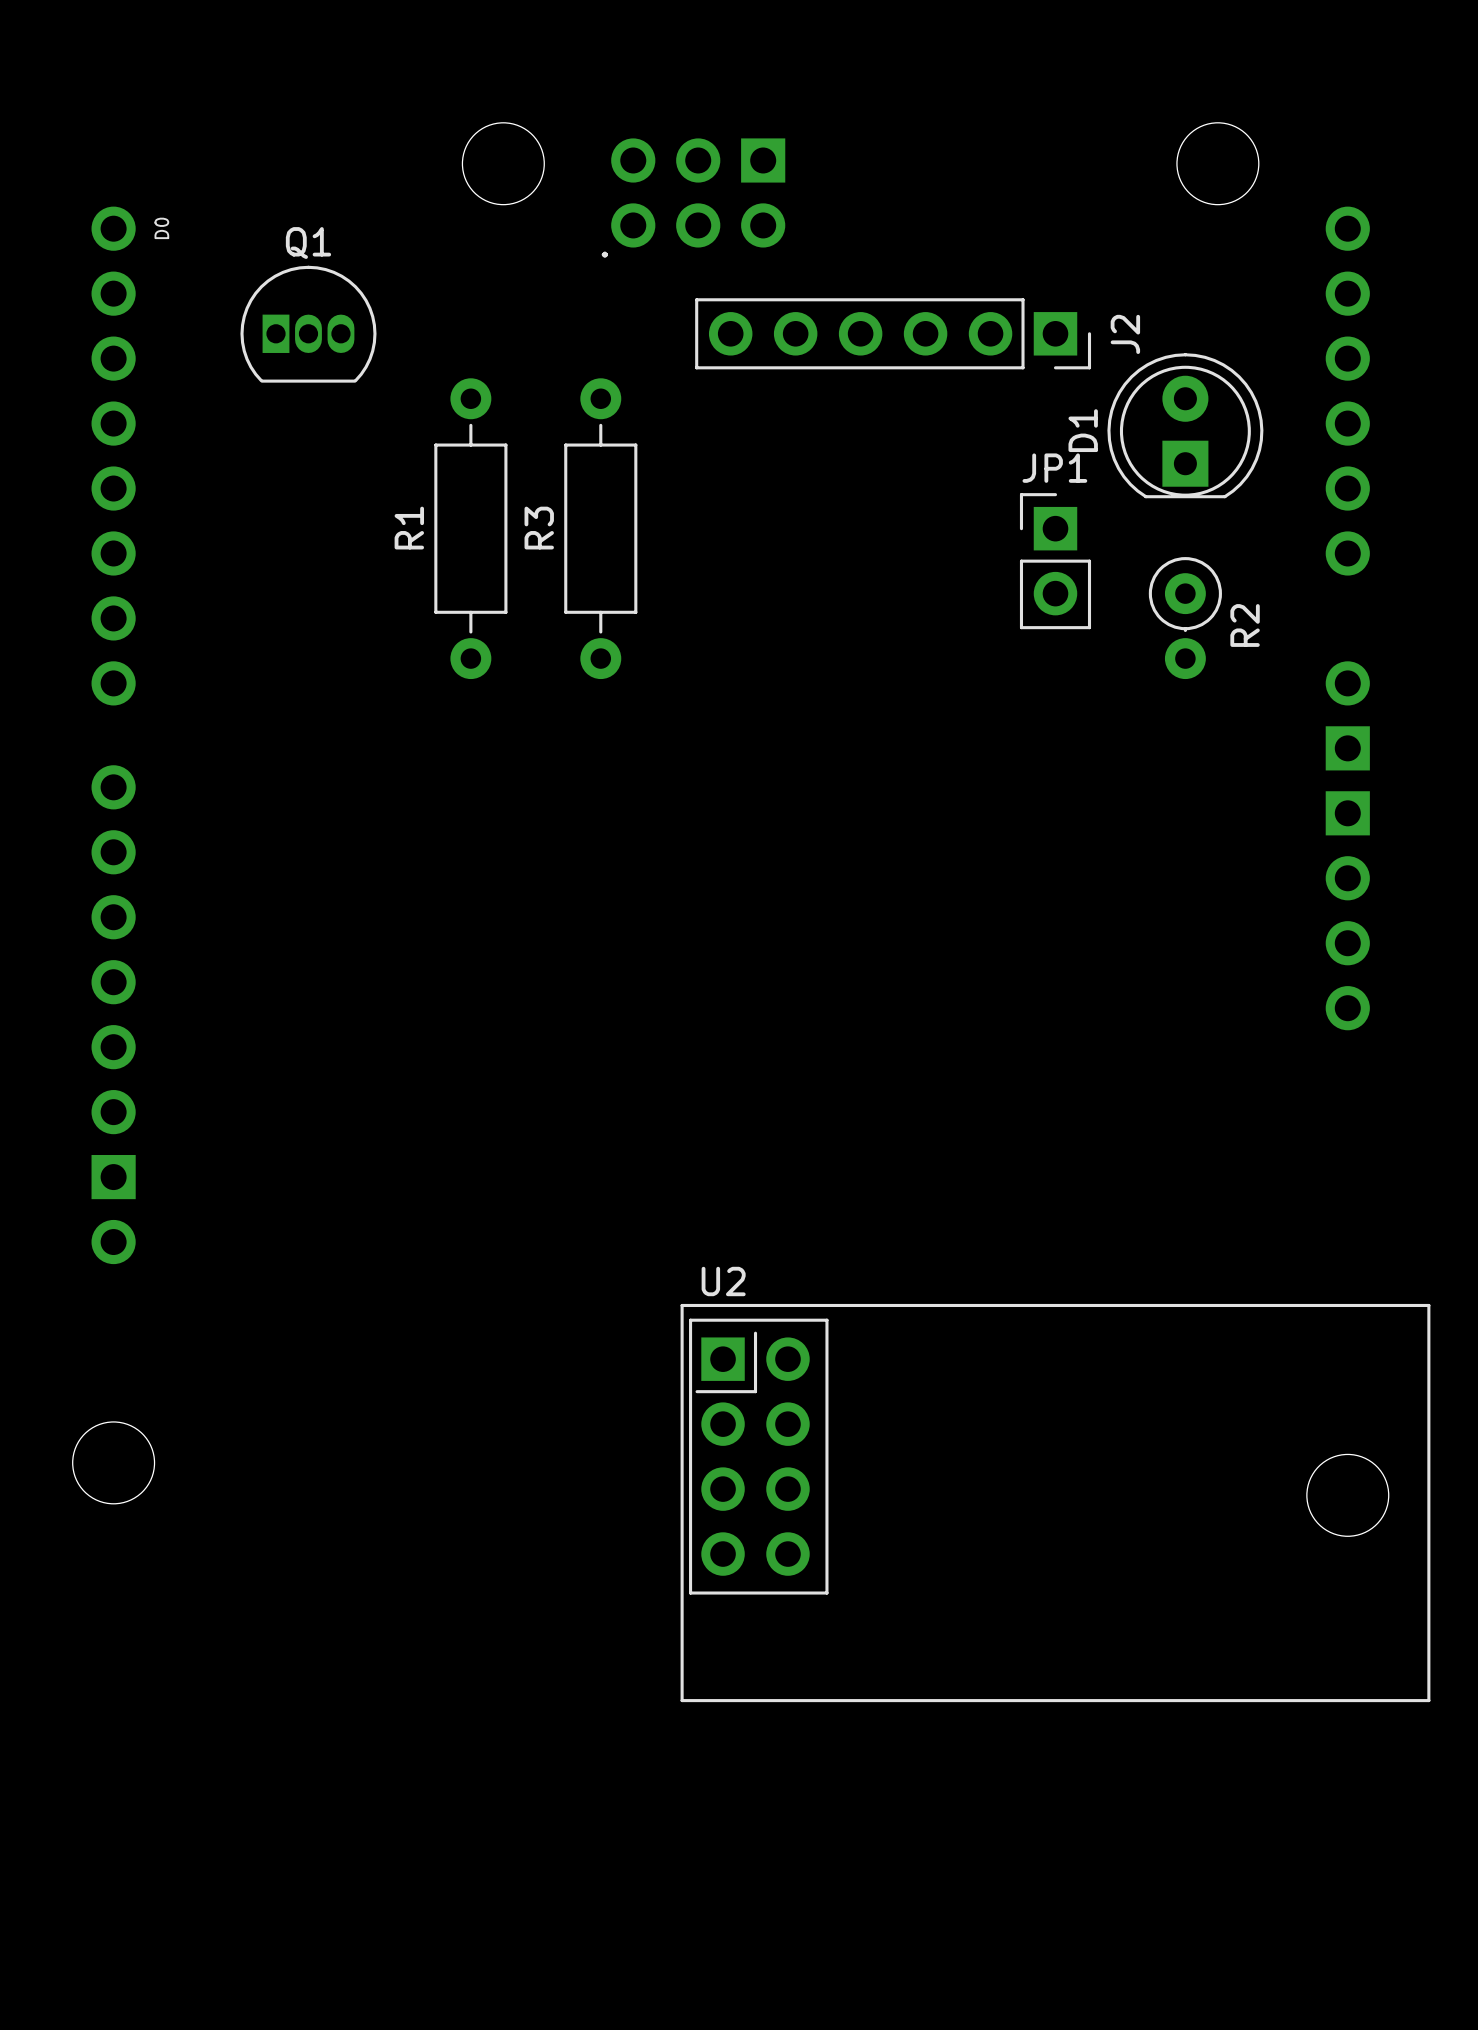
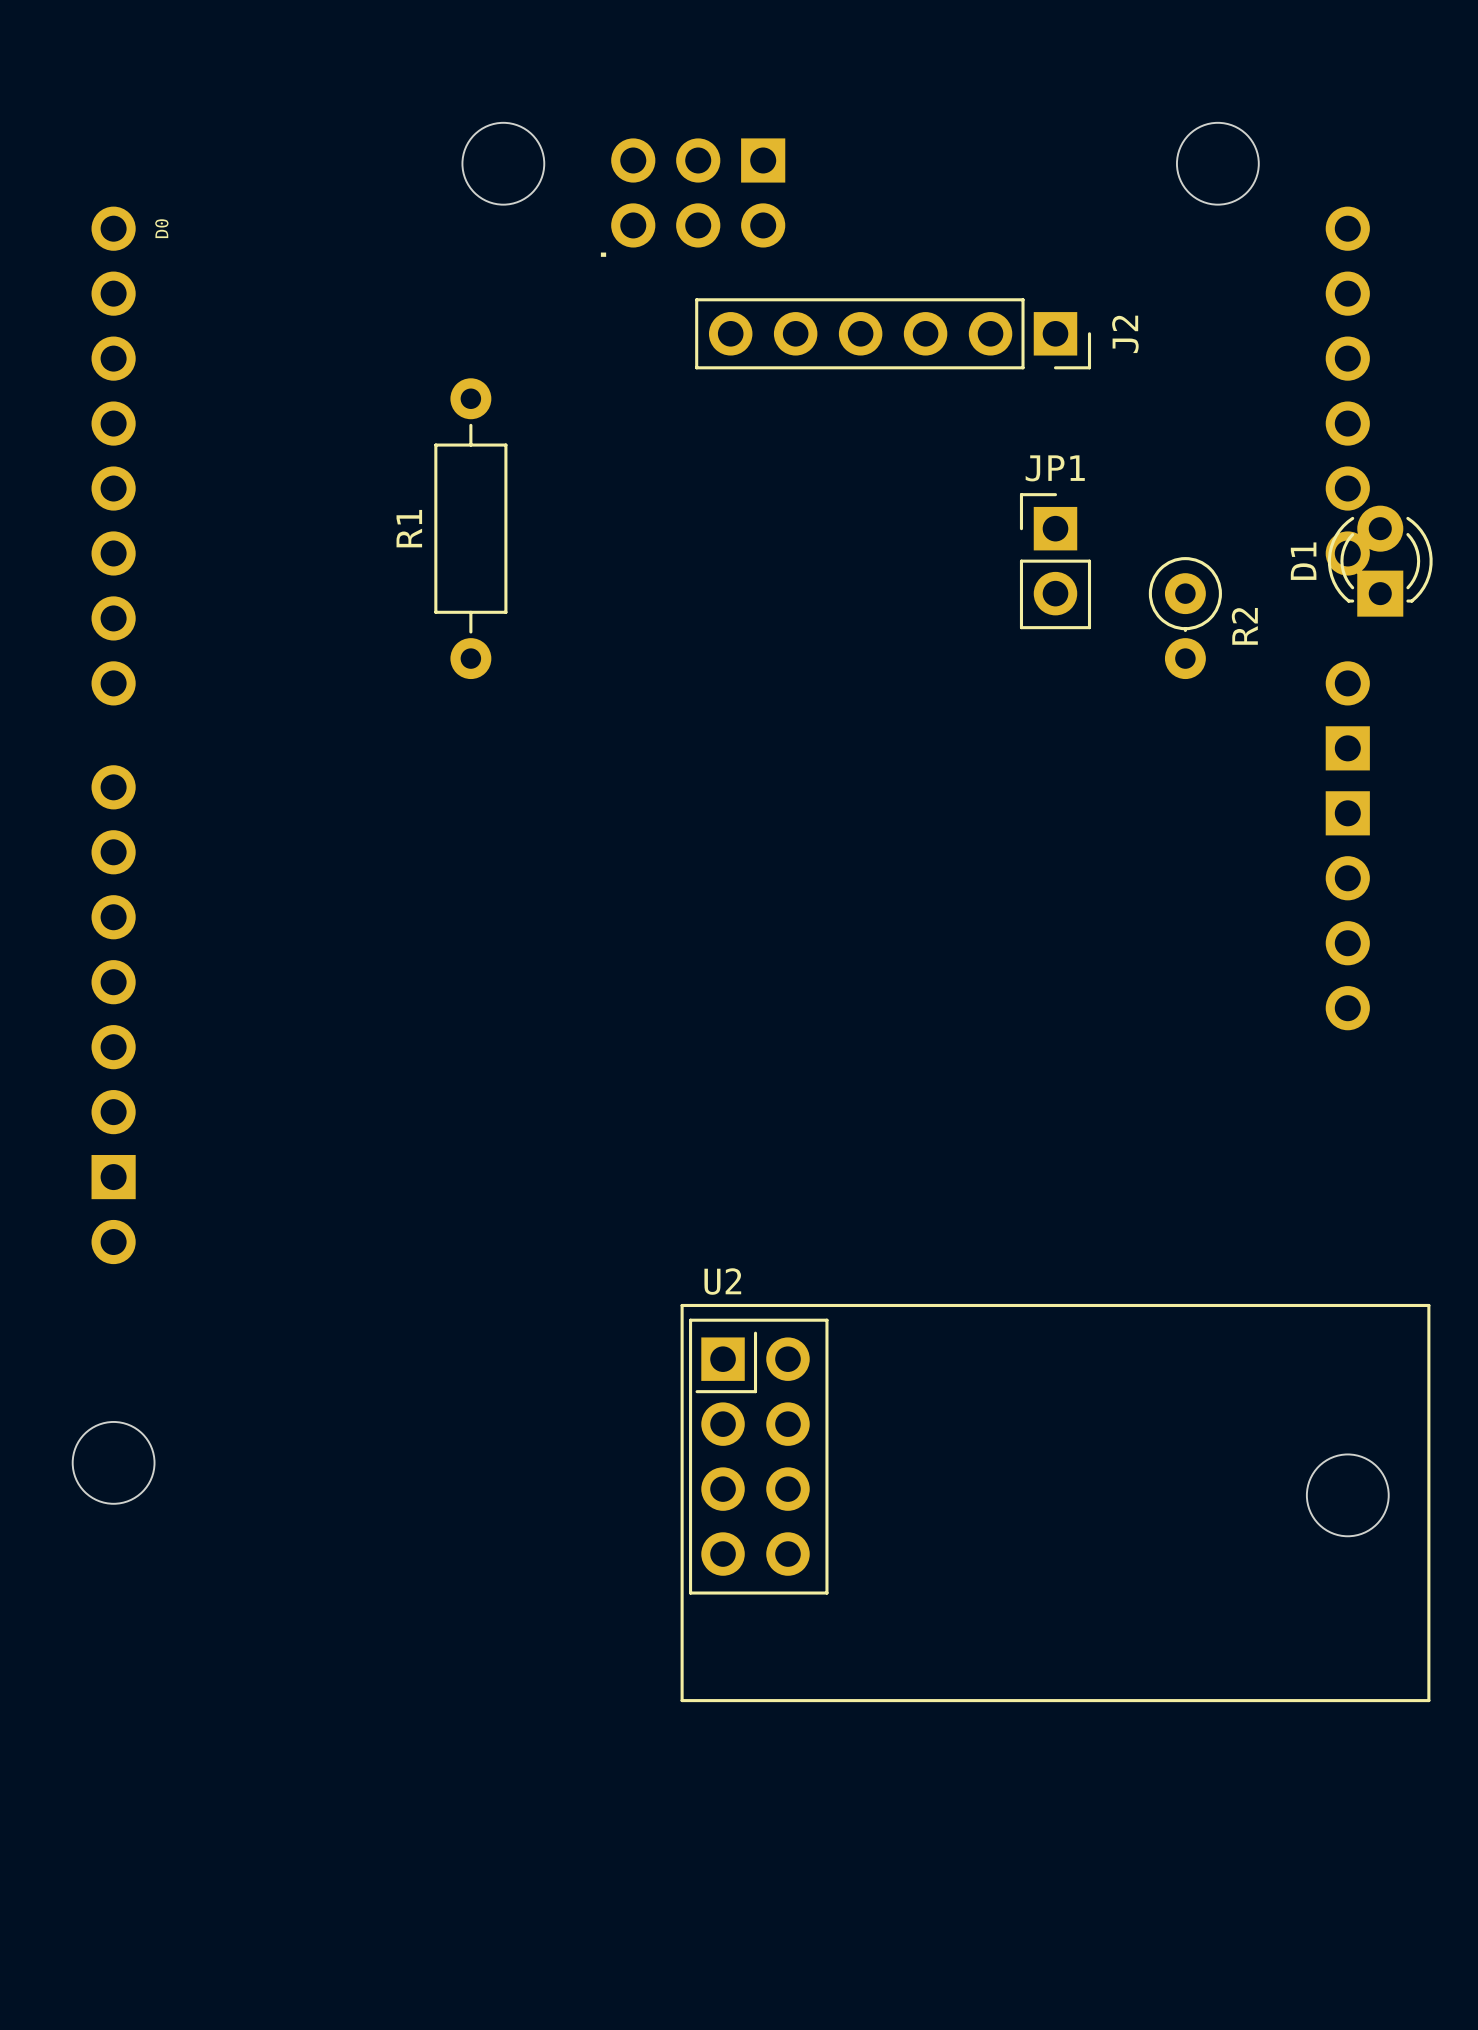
Q1: (308, 324) -> none
D1 footprint: [1107, 353, 1264, 499] -> [1327, 505, 1433, 617]
R3: (600, 528) -> none

